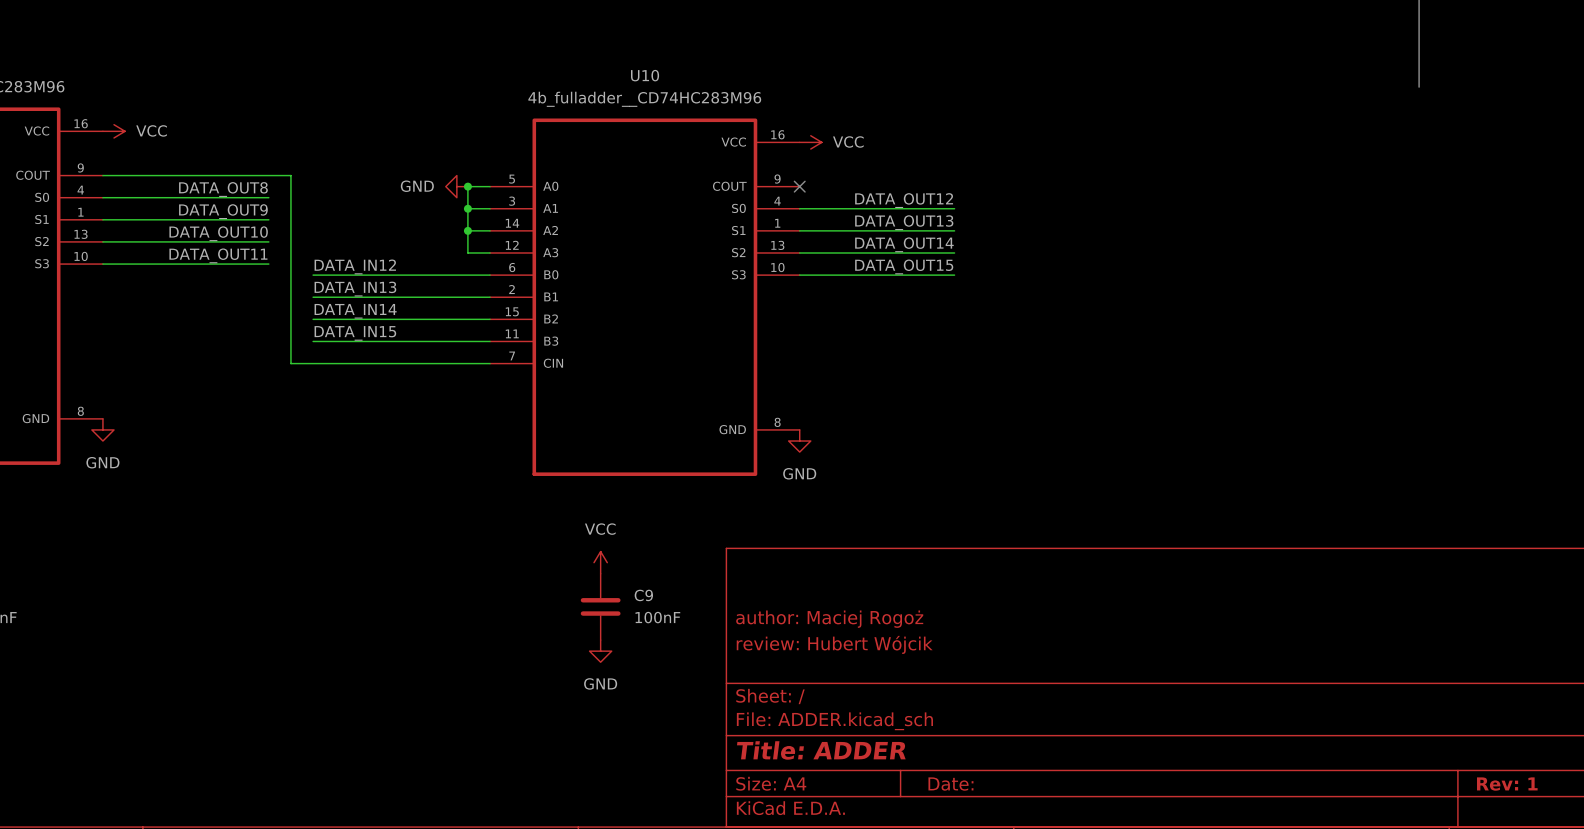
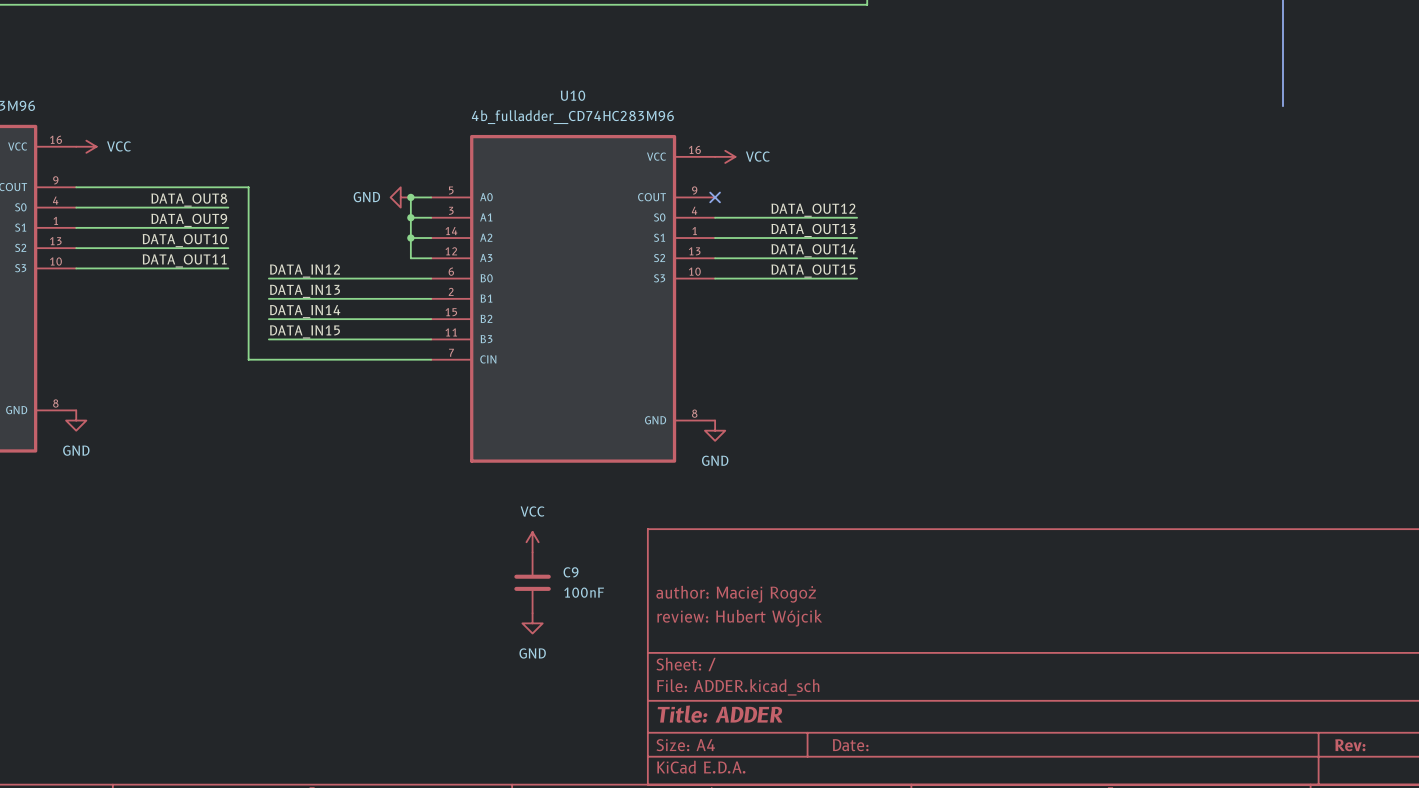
title block: Rev: 1 (1507, 784) -> Rev: (1350, 745)

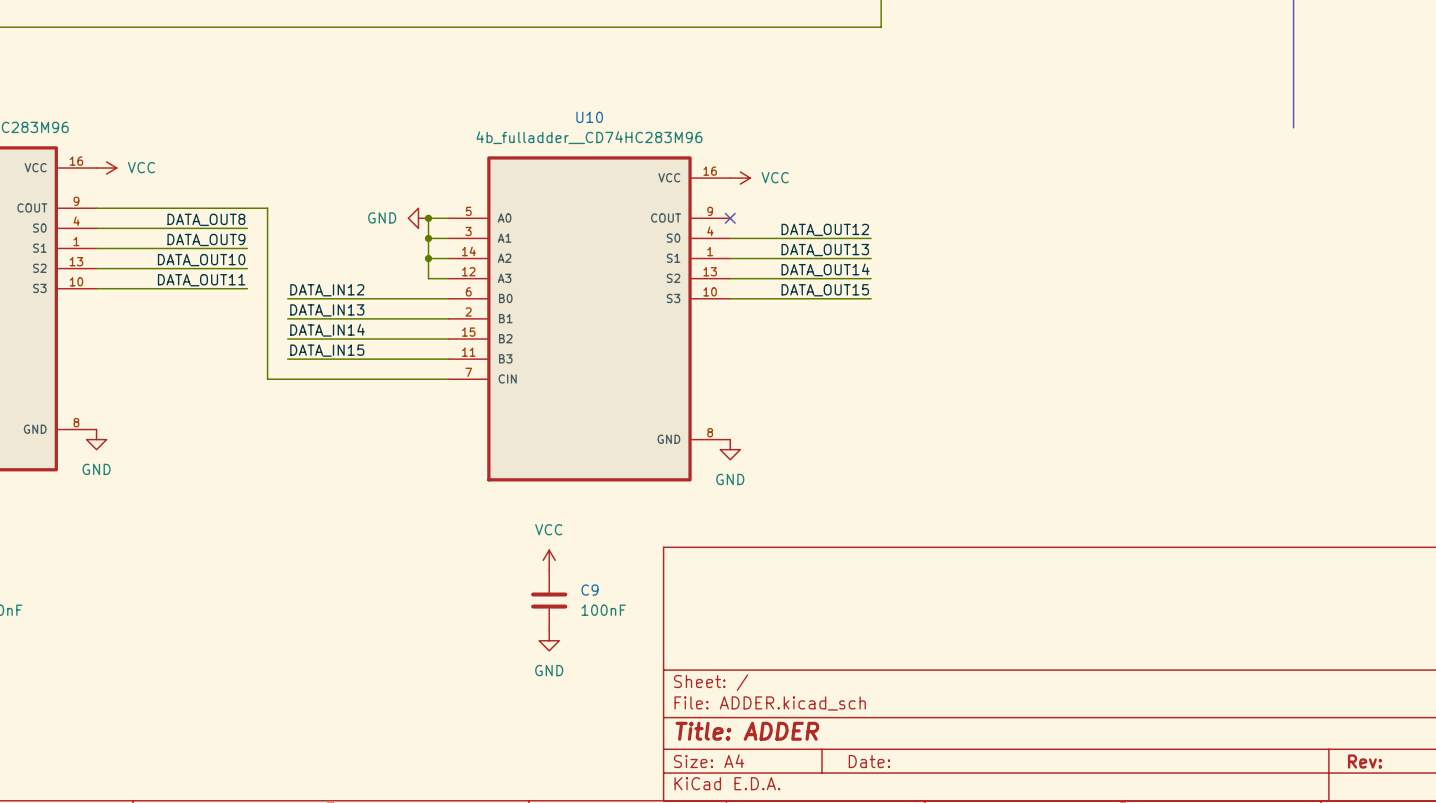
title block: author: Maciej Rogoż (736, 594) -> none
title block: review: Hubert Wójcik (739, 618) -> none

